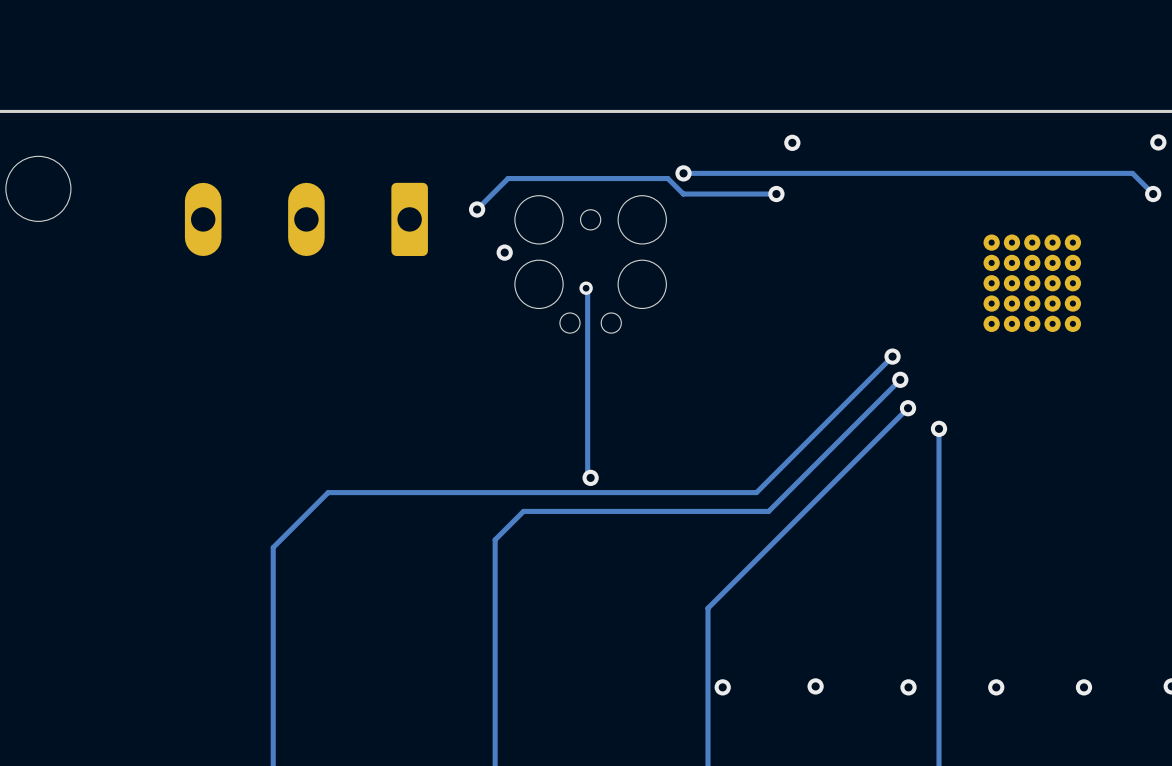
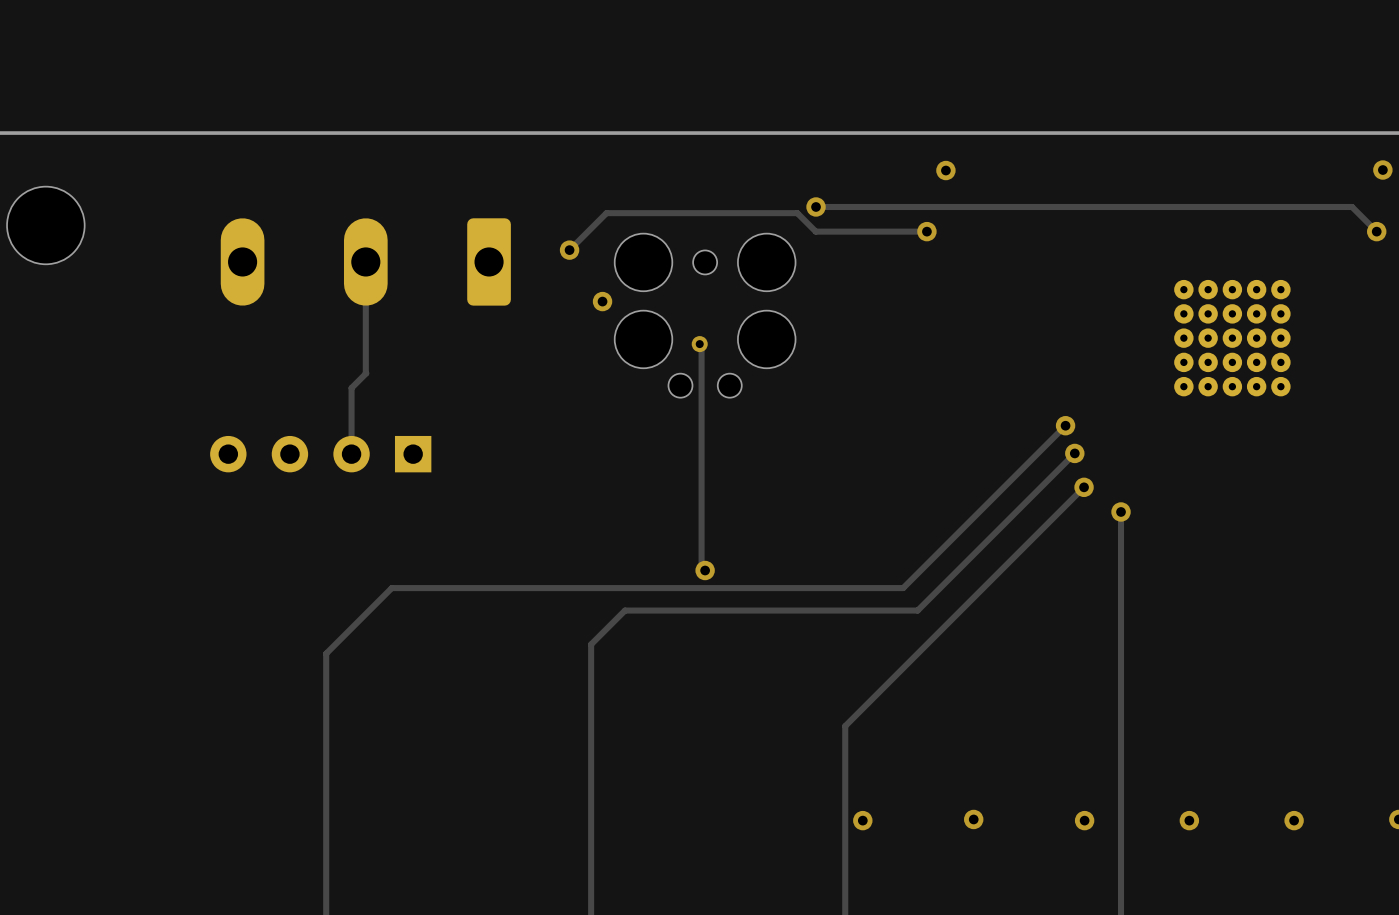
track: none -> (365, 261) (366, 373) (351, 388) (351, 454)
part: none -> (320, 454)

